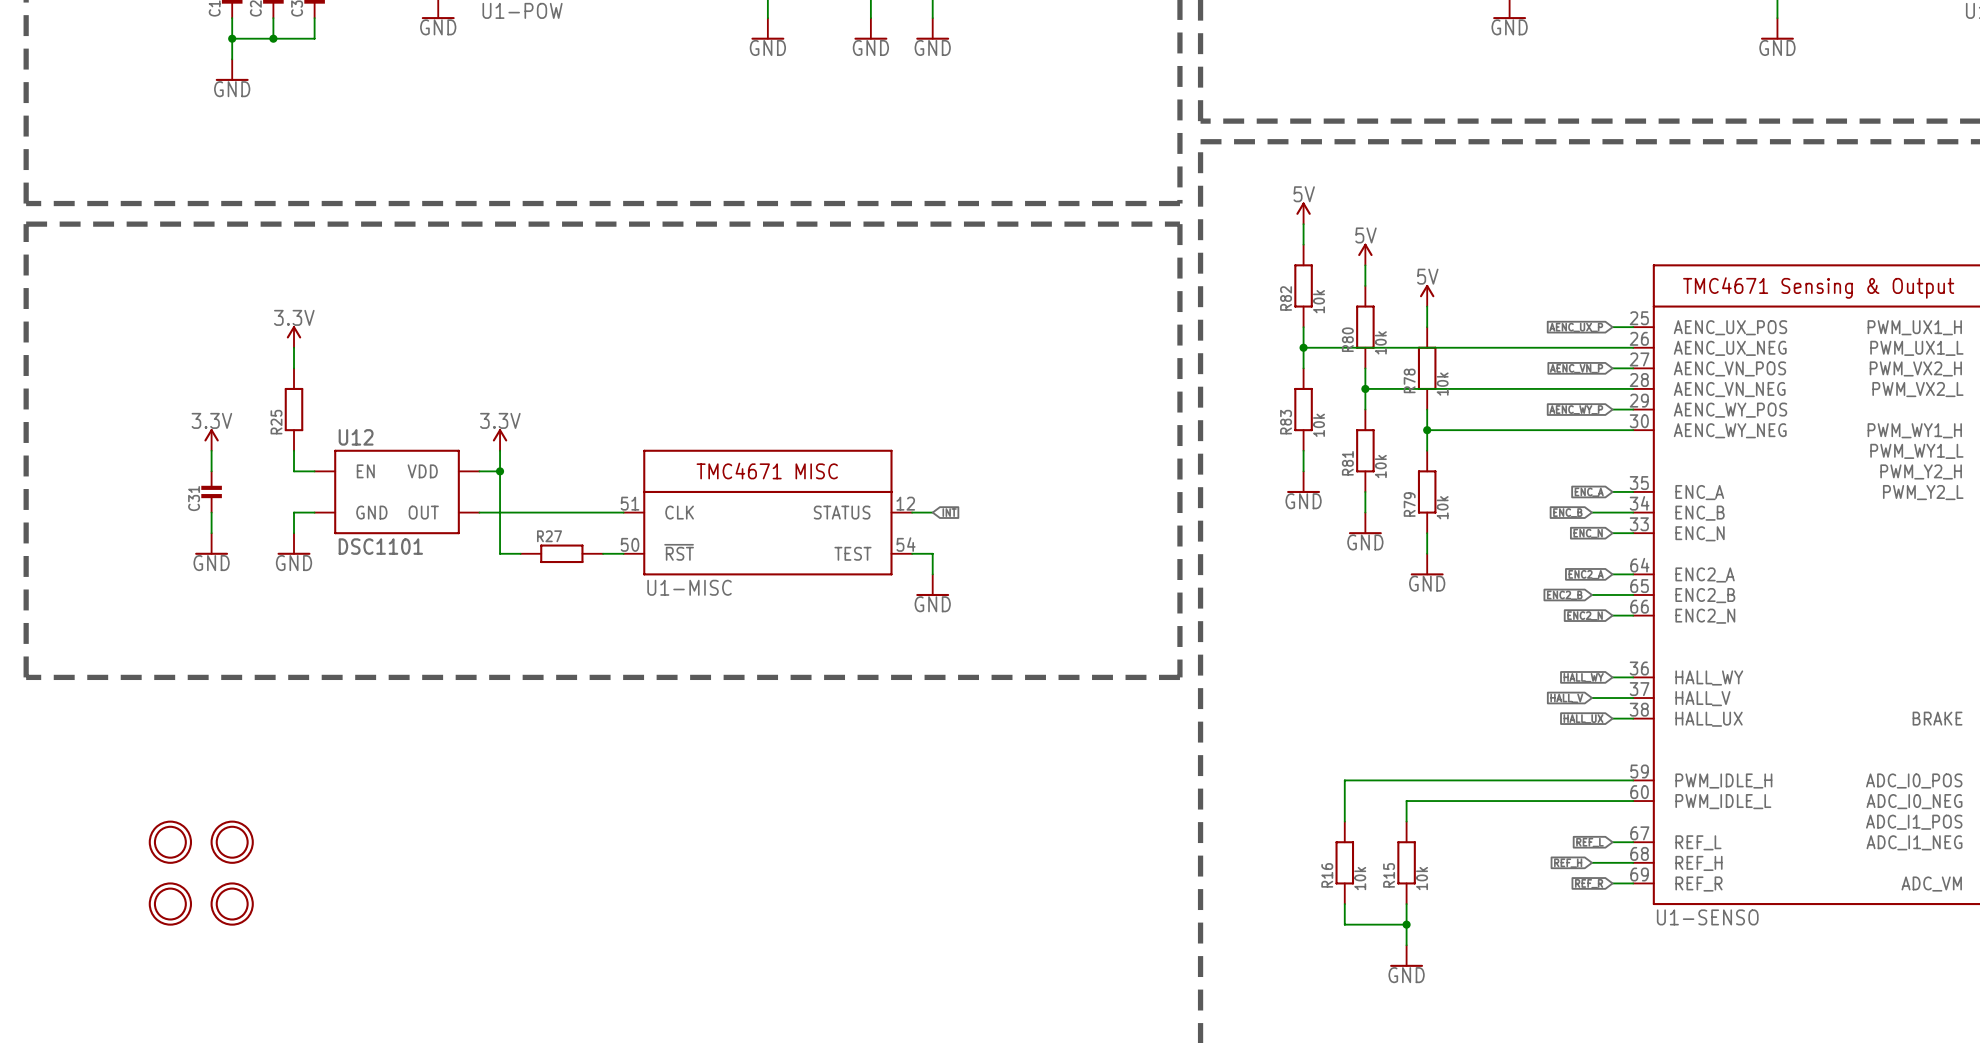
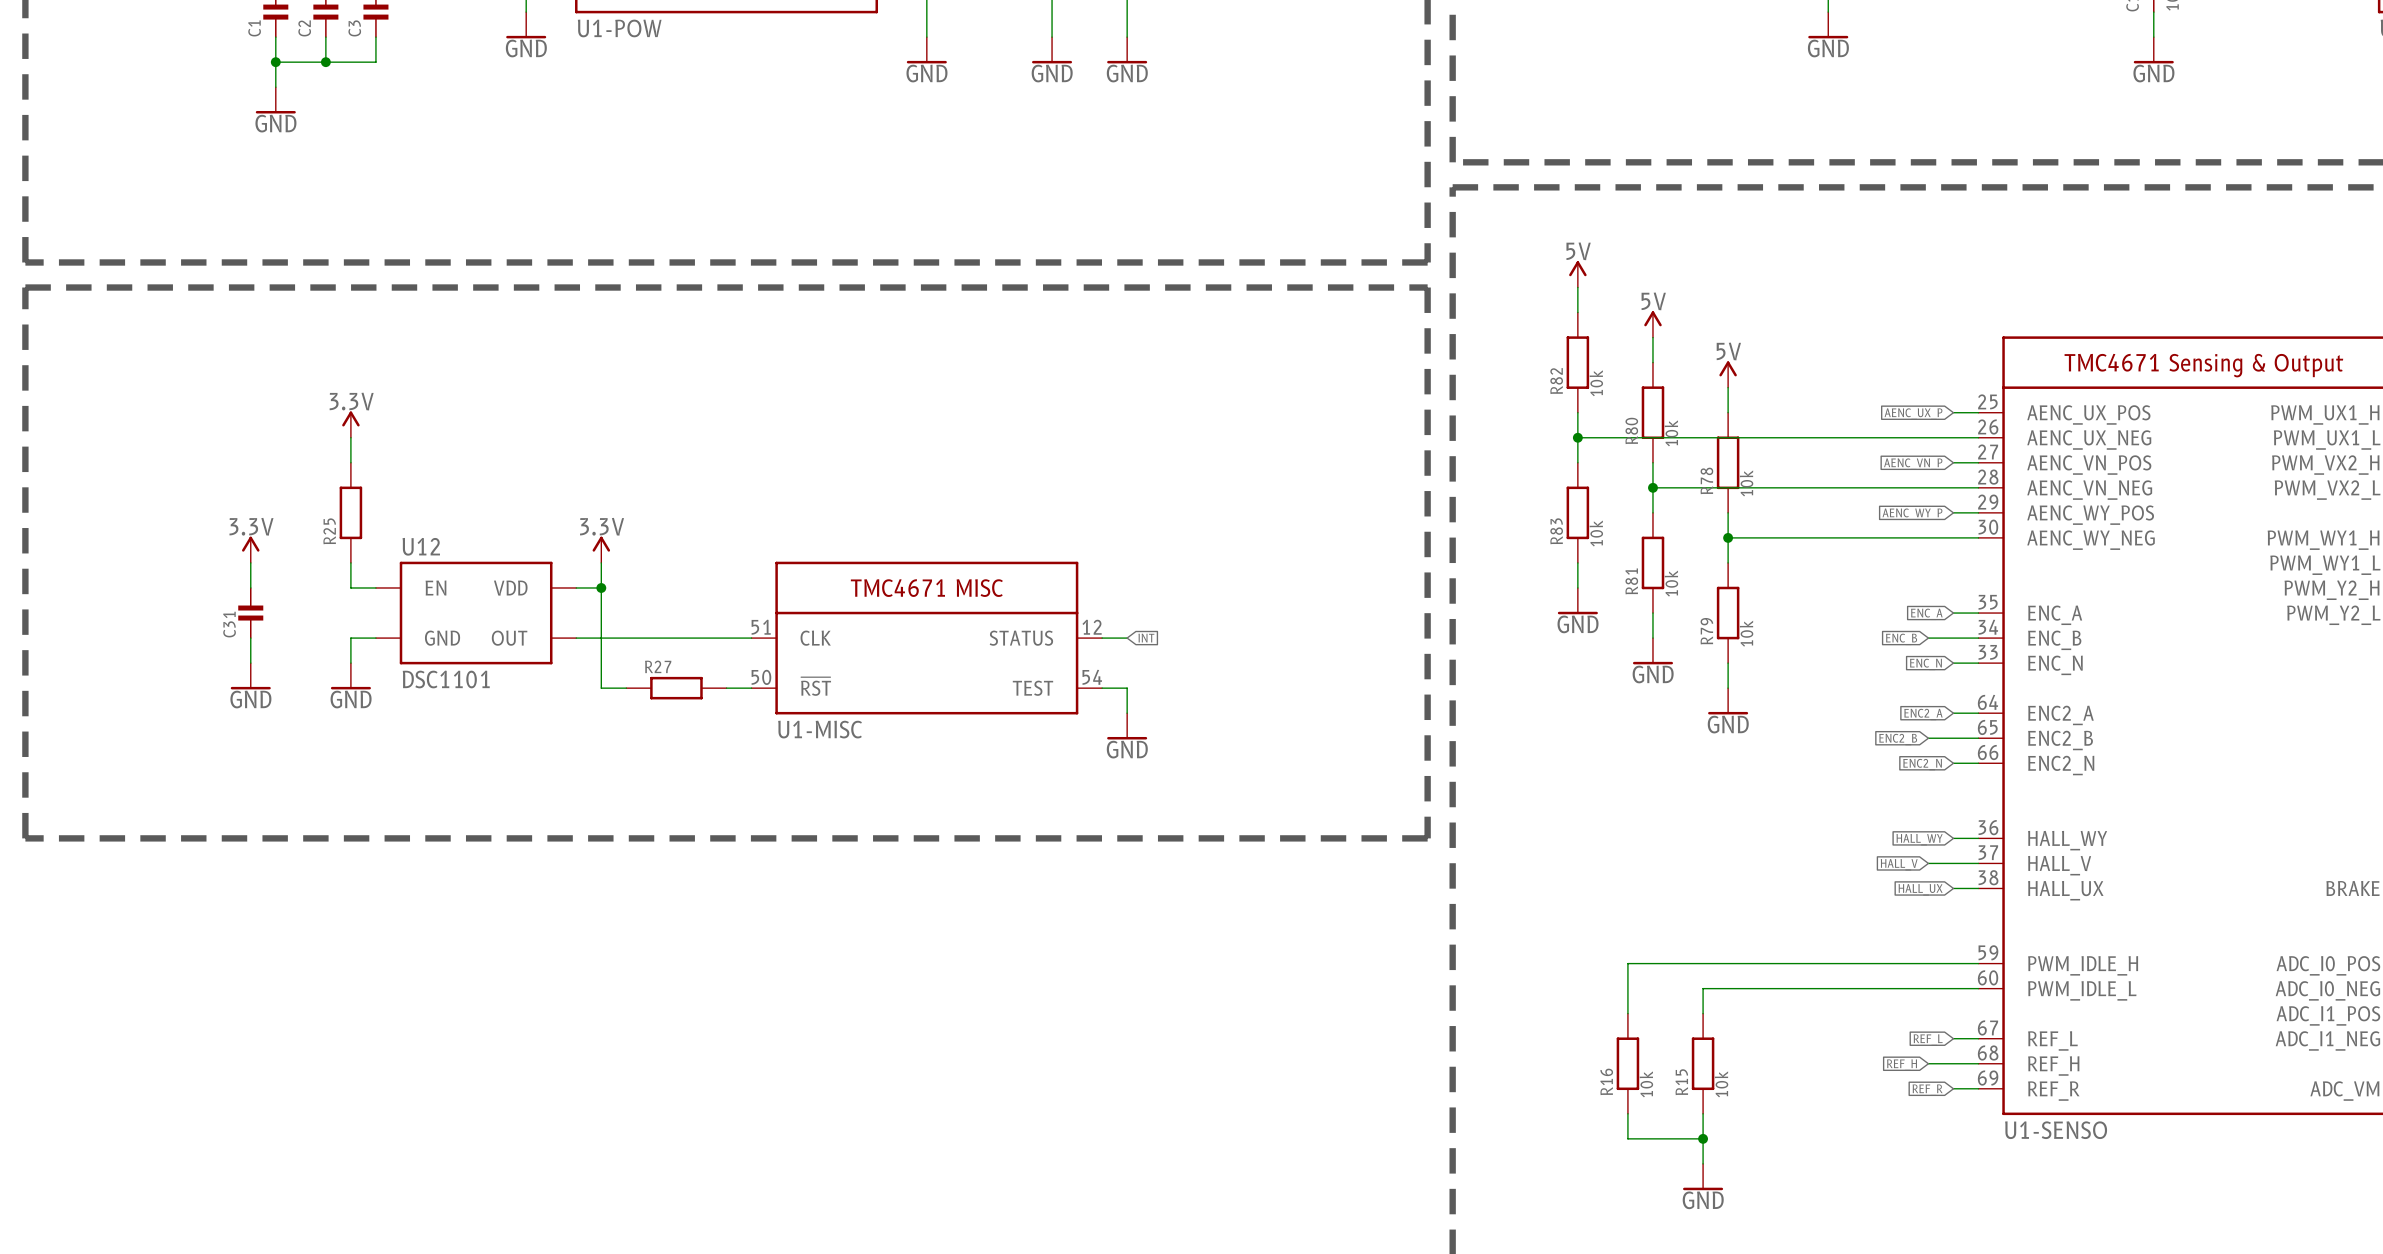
part: (170, 842) -> none
part: (232, 842) -> none
part: (170, 904) -> none
part: (232, 904) -> none

